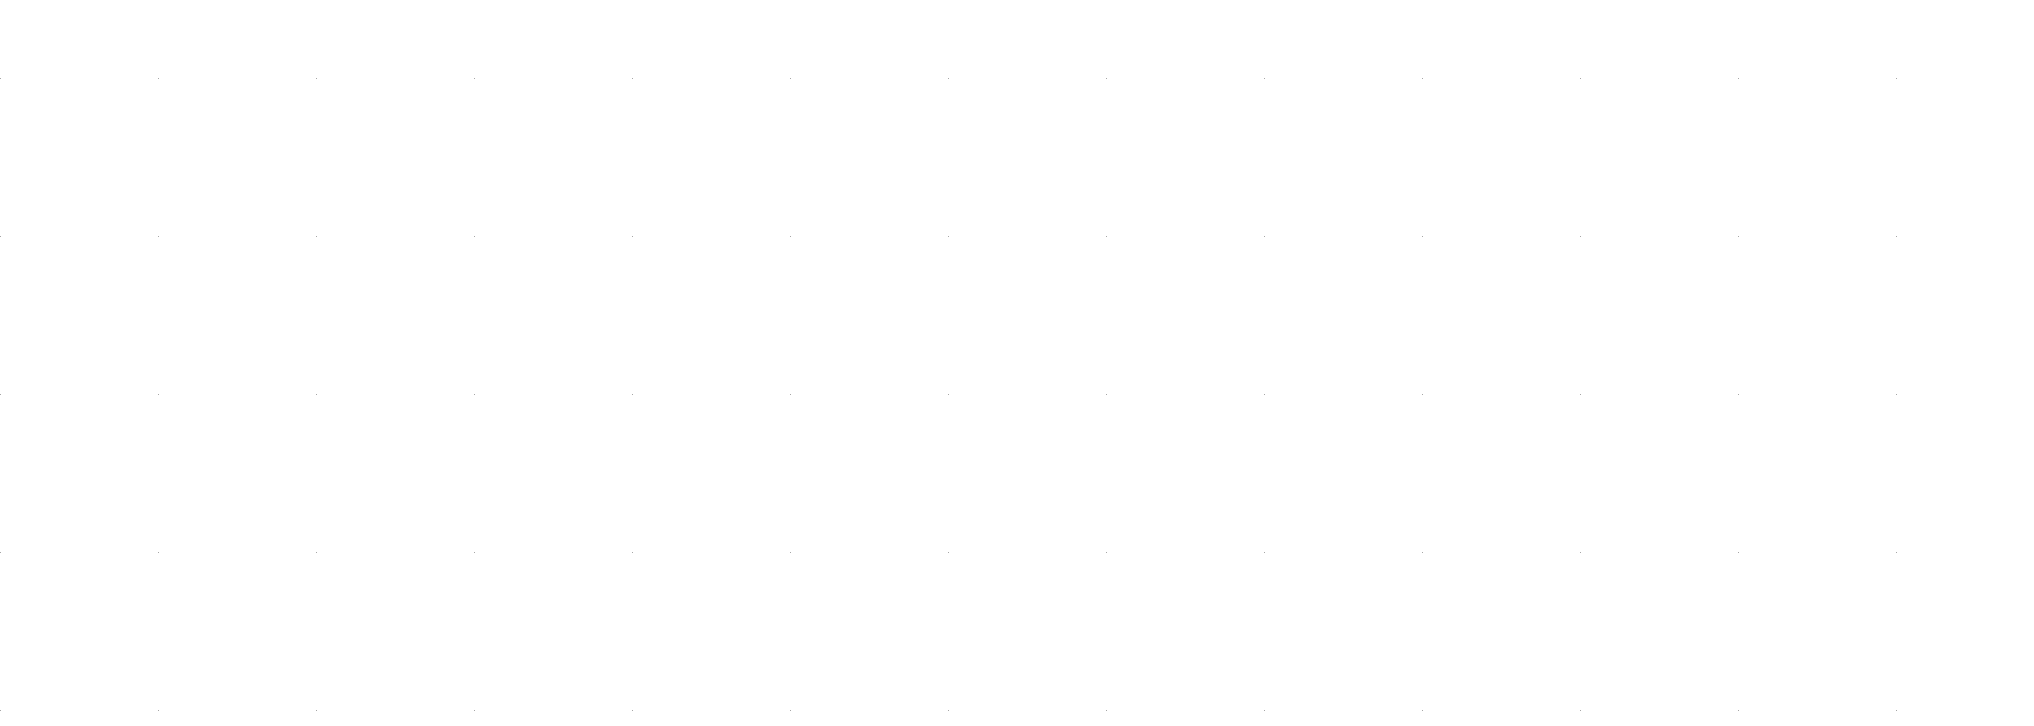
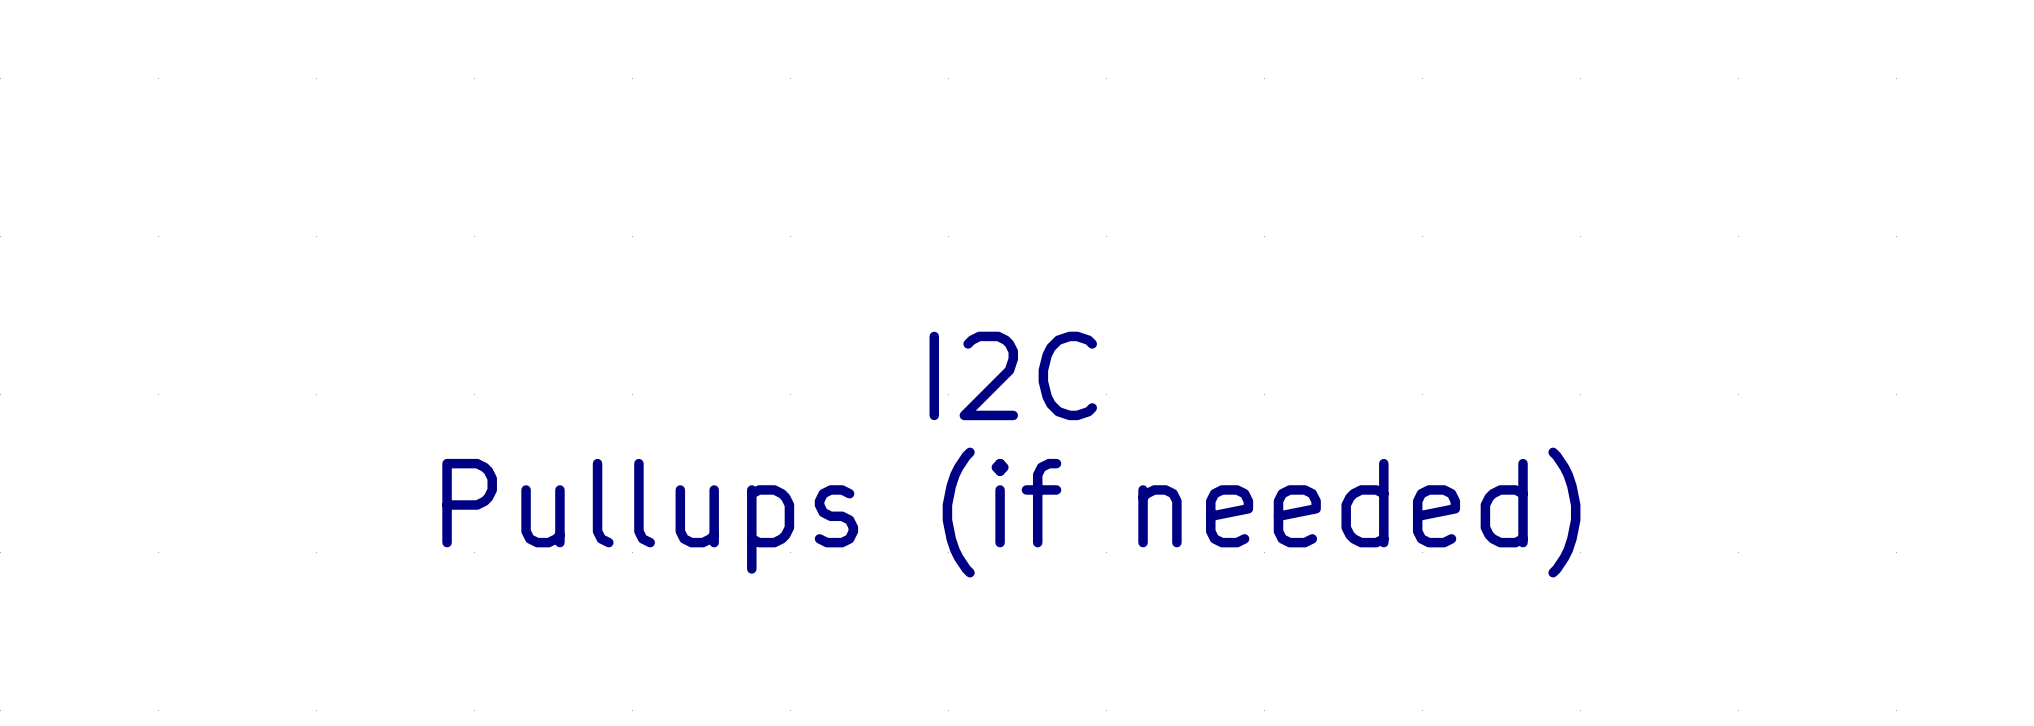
text: none -> I2C (1013, 375)
text: none -> Pullups (if needed) (1011, 512)

